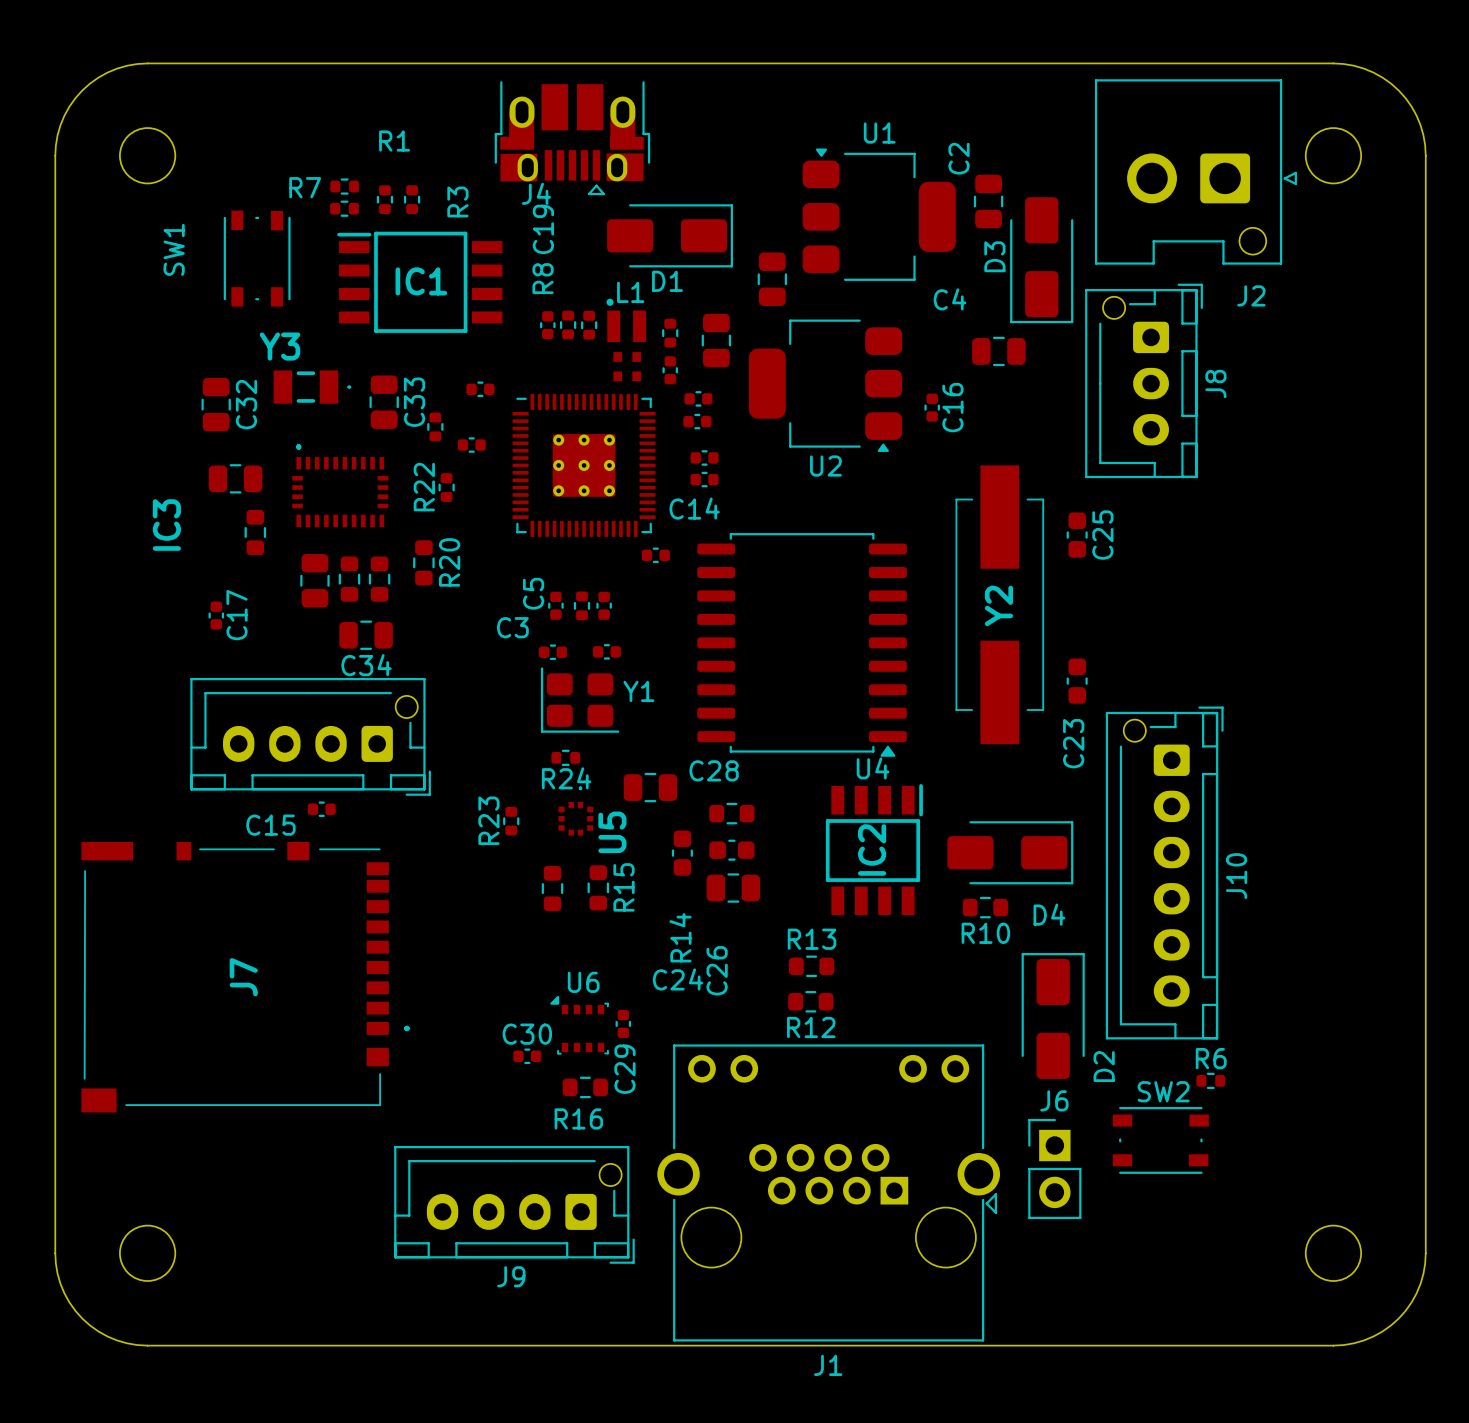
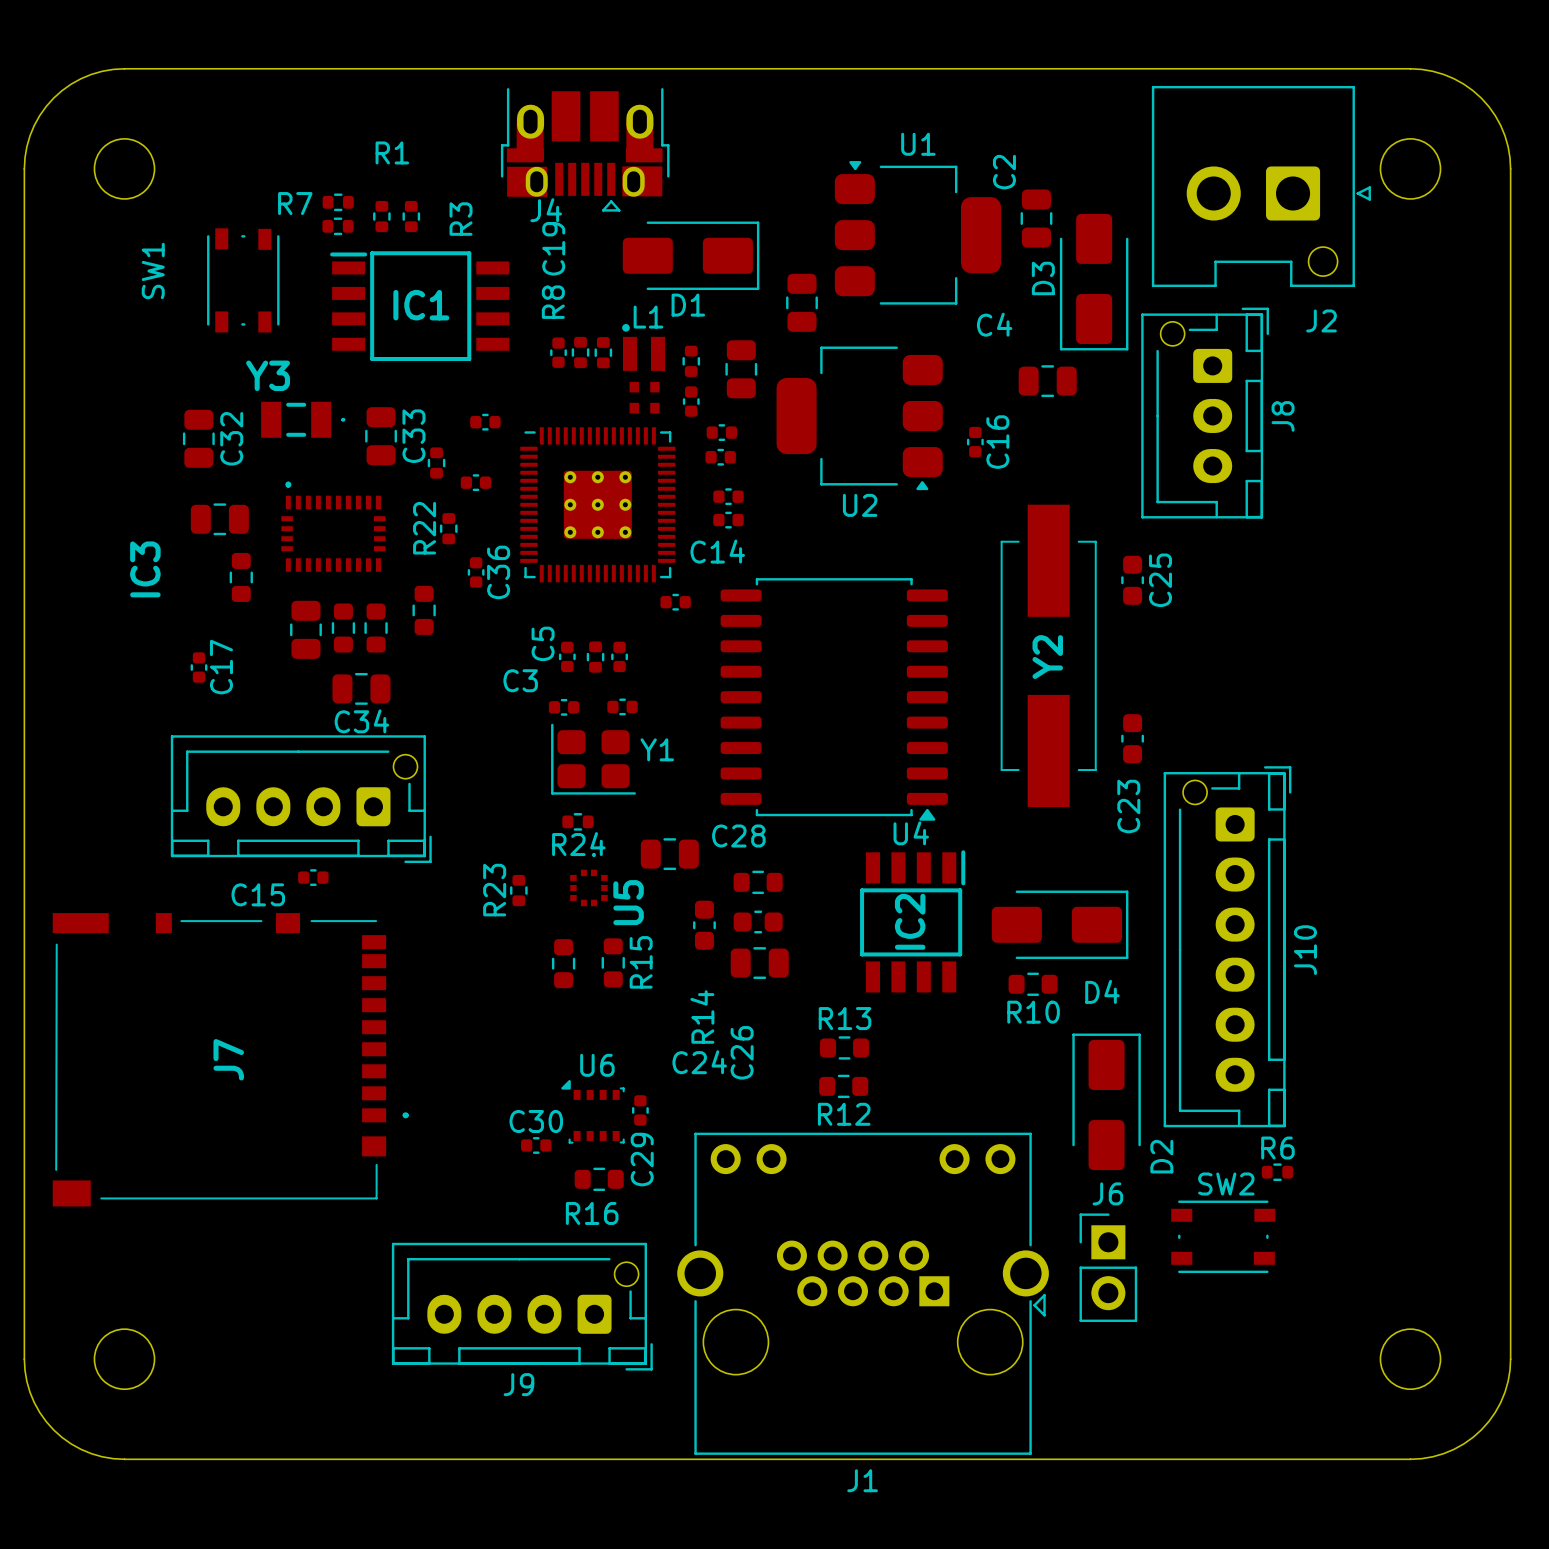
C36: none -> (476, 572)
R20 name: R20 (449, 562) -> none

